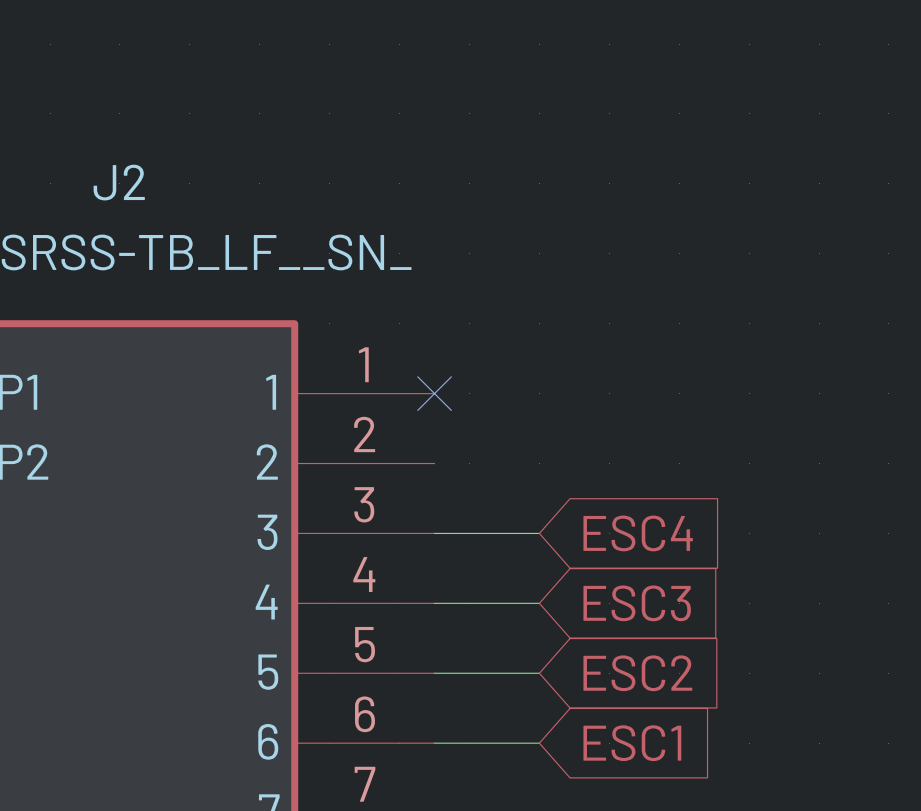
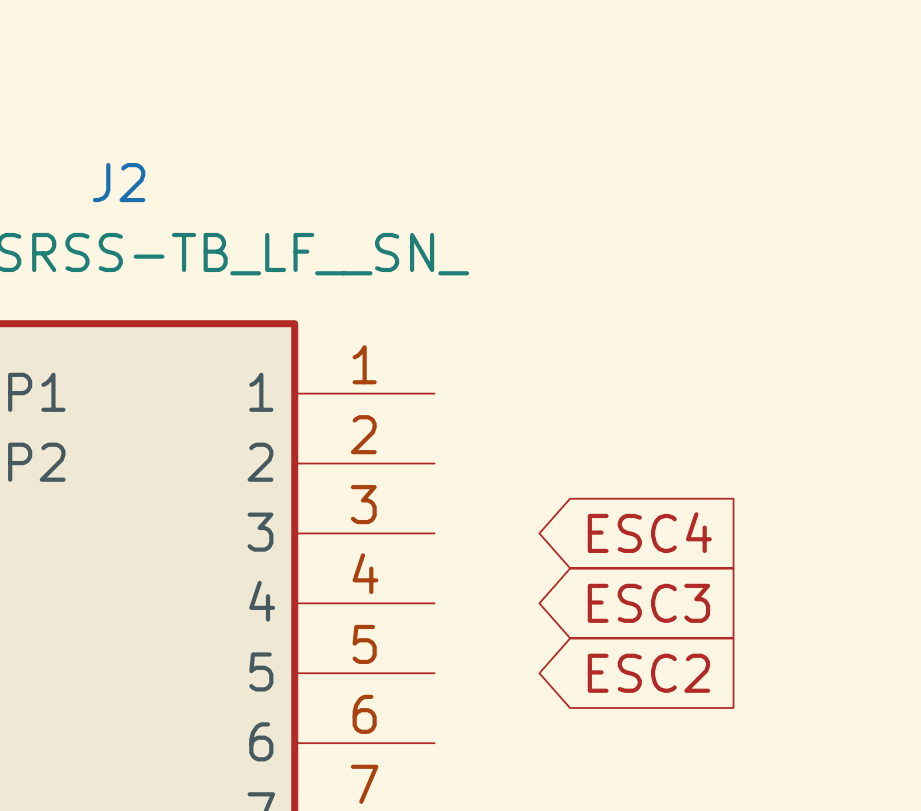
no-connect mark: (434, 393) -> none
wire: (434, 533) (539, 533) -> none
wire: (434, 603) (539, 603) -> none
wire: (434, 673) (539, 673) -> none
wire: (434, 743) (539, 743) -> none
global label: ESC1 (632, 743) -> none

